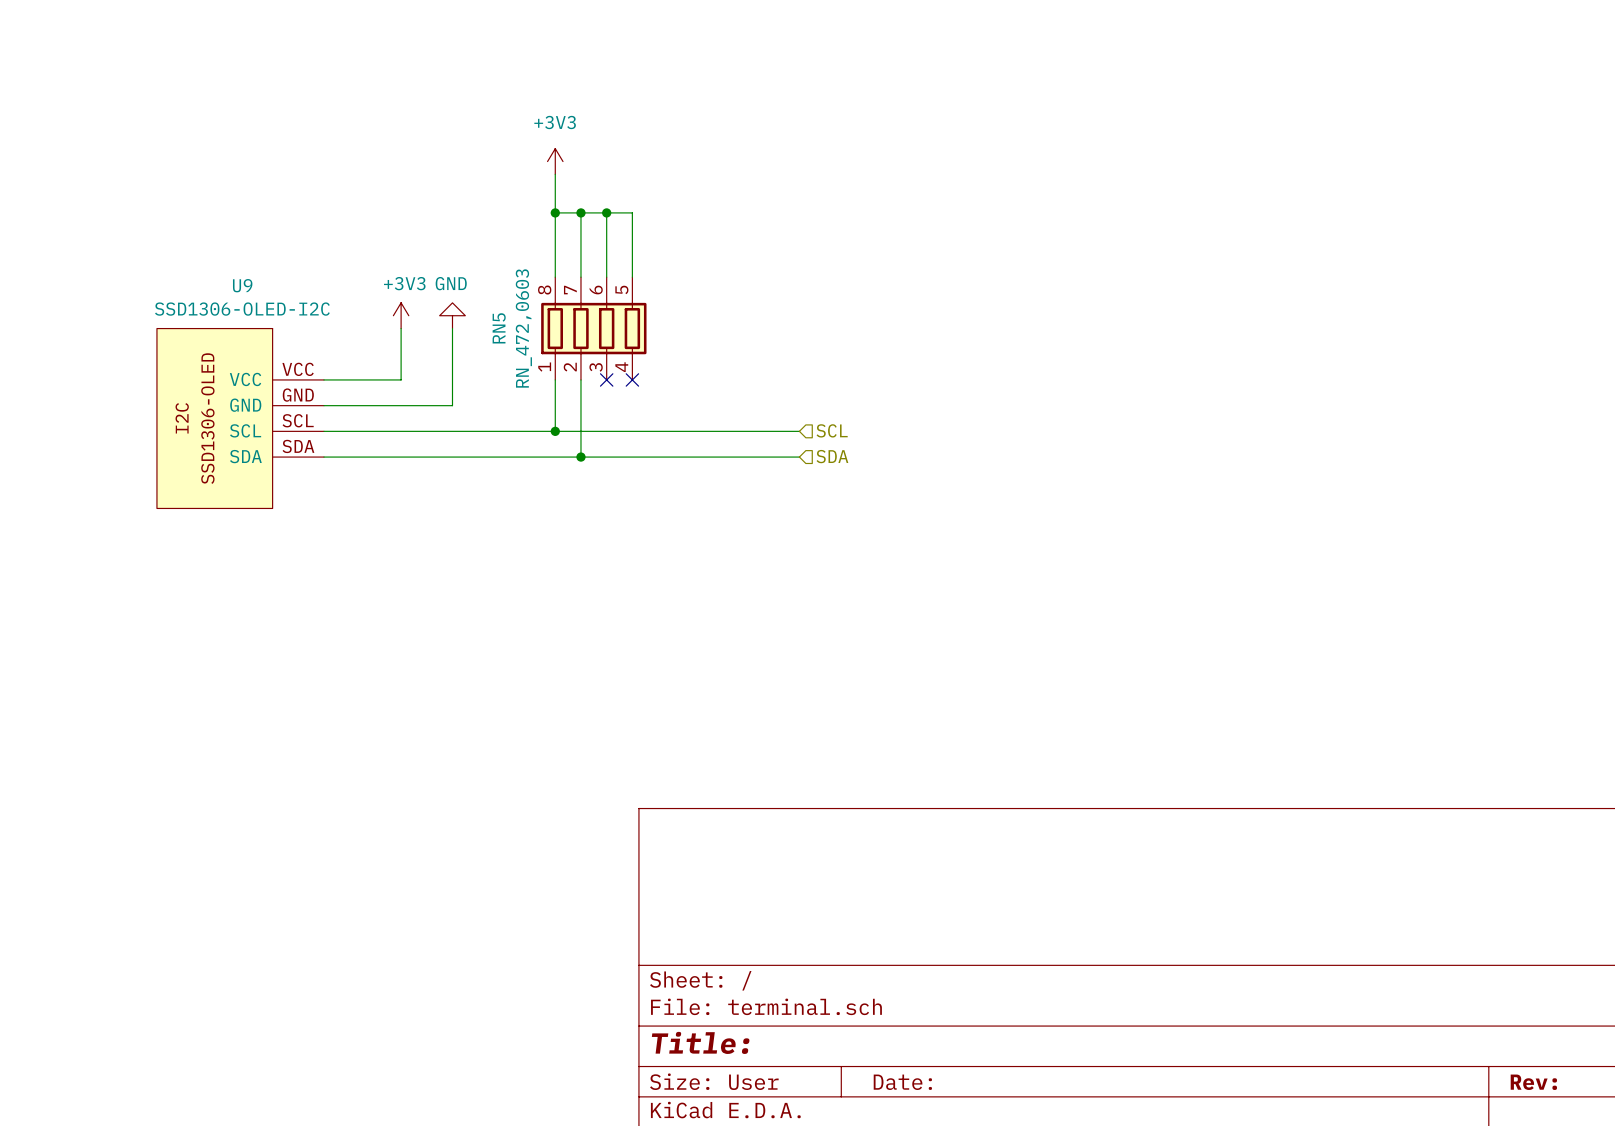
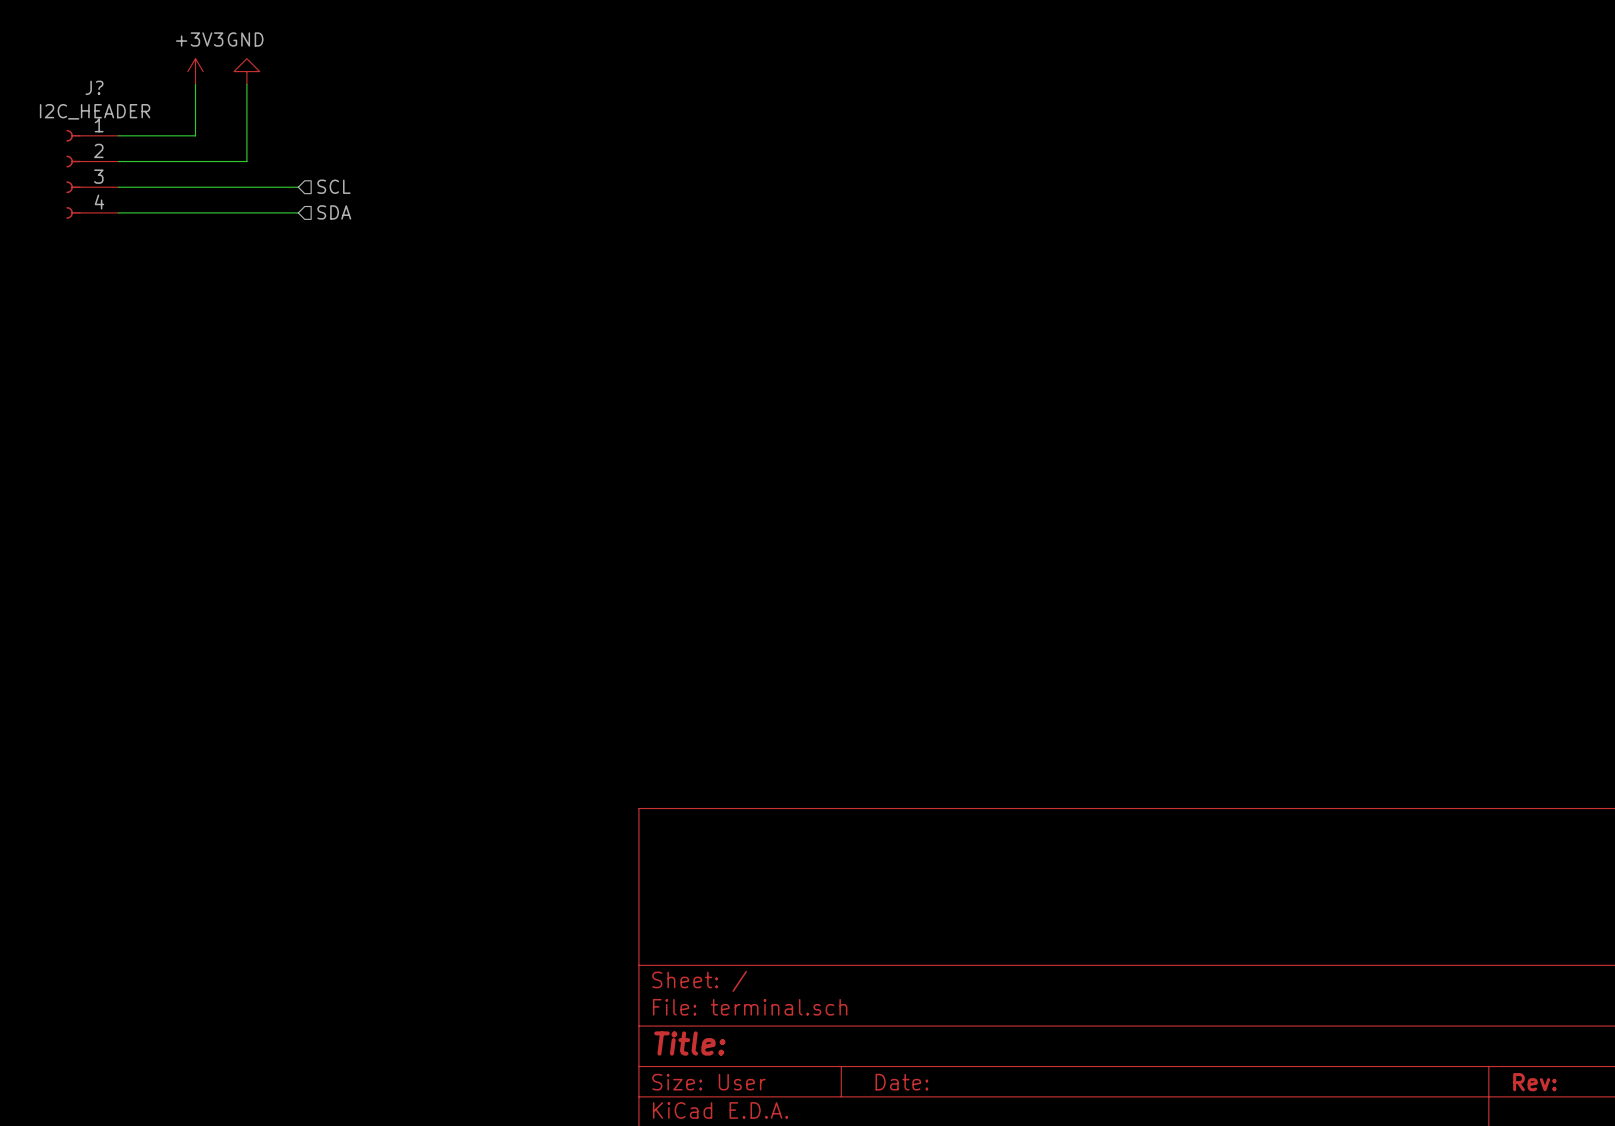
power symbol: none -> +3V3 (195, 71)
power symbol: none -> GND (246, 71)
wire: none -> (195, 84) (195, 135) (118, 135)
wire: none -> (246, 84) (246, 161) (118, 161)
power symbol: +3V3 (555, 161) -> none
J?: none -> I2C_HEADER (92, 174)
wire: (555, 174) (555, 277) -> none
hierarchical label: none -> SCL (333, 186)
wire: none -> (118, 187) (298, 187)
wire: none -> (118, 212) (298, 212)
hierarchical label: none -> SDA (334, 212)
wire: (555, 212) (632, 212) (632, 277) -> none
junction: (555, 212) -> none
wire: (580, 212) (580, 277) -> none
junction: (580, 212) -> none
wire: (606, 212) (606, 277) -> none
junction: (606, 212) -> none
power symbol: +3V3 (401, 315) -> none
power symbol: GND (452, 315) -> none
wire: (401, 328) (401, 379) (324, 379) -> none
wire: (452, 328) (452, 405) (324, 405) -> none
RN5: RN_472,0603 (593, 328) -> none
wire: (555, 379) (555, 431) -> none
wire: (580, 379) (580, 457) -> none
no-connect mark: (606, 379) -> none
no-connect mark: (632, 379) -> none
U9: SSD1306-OLED-I2C (240, 418) -> none
hierarchical label: SCL (832, 430) -> none
wire: (324, 431) (799, 431) -> none
junction: (555, 431) -> none
hierarchical label: SDA (832, 456) -> none
wire: (324, 457) (799, 457) -> none
junction: (580, 457) -> none

